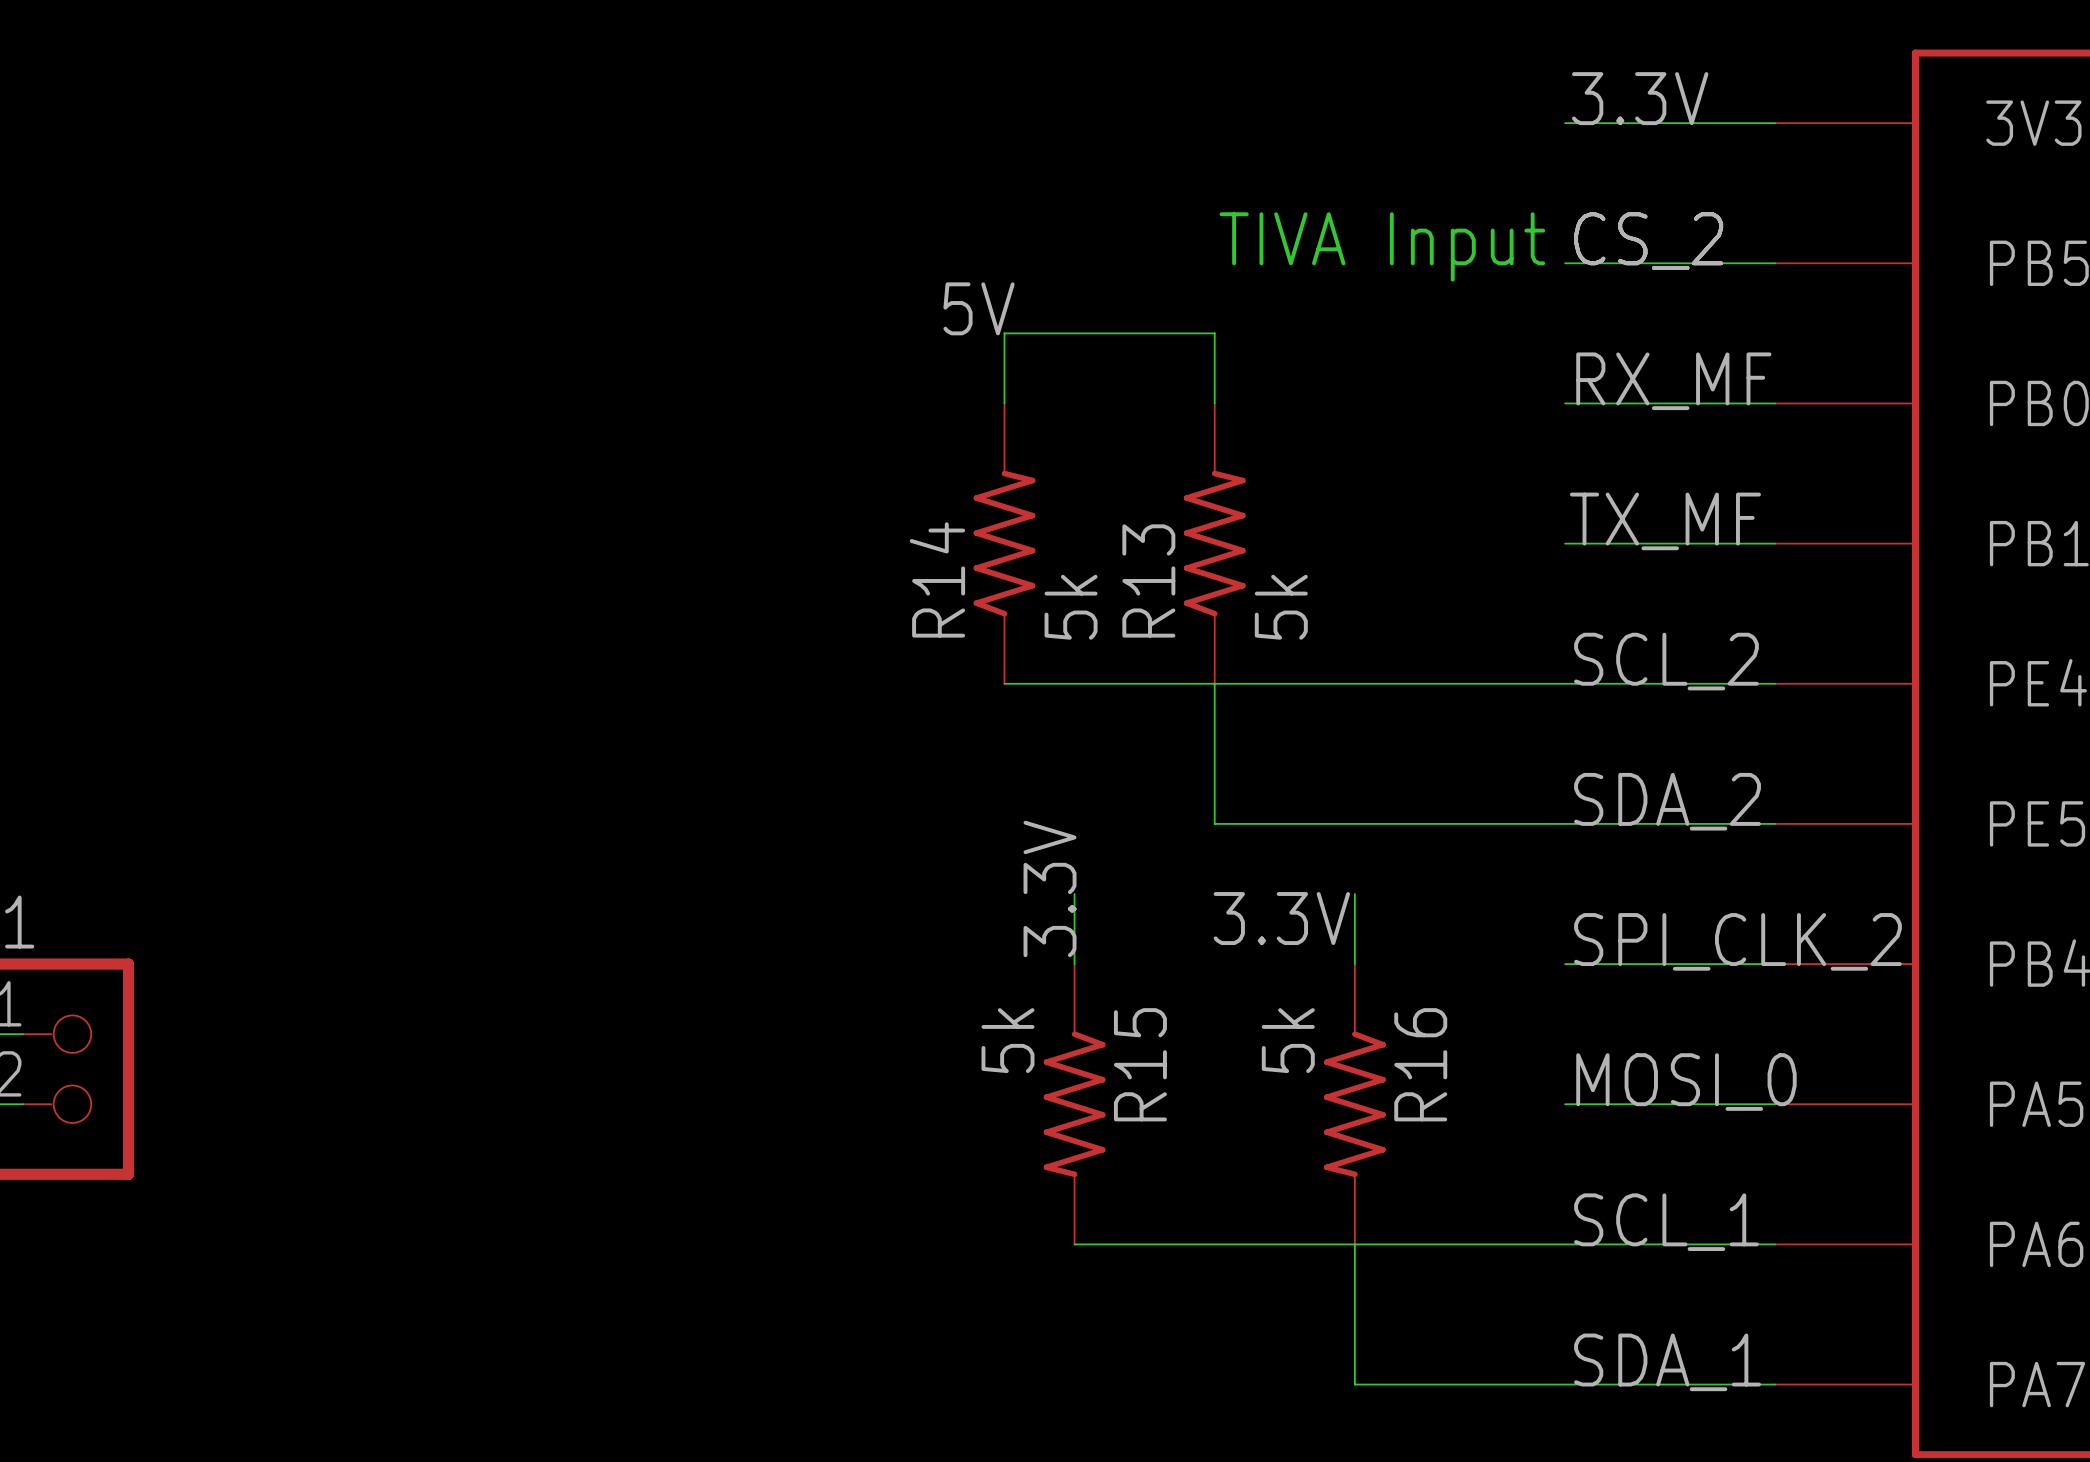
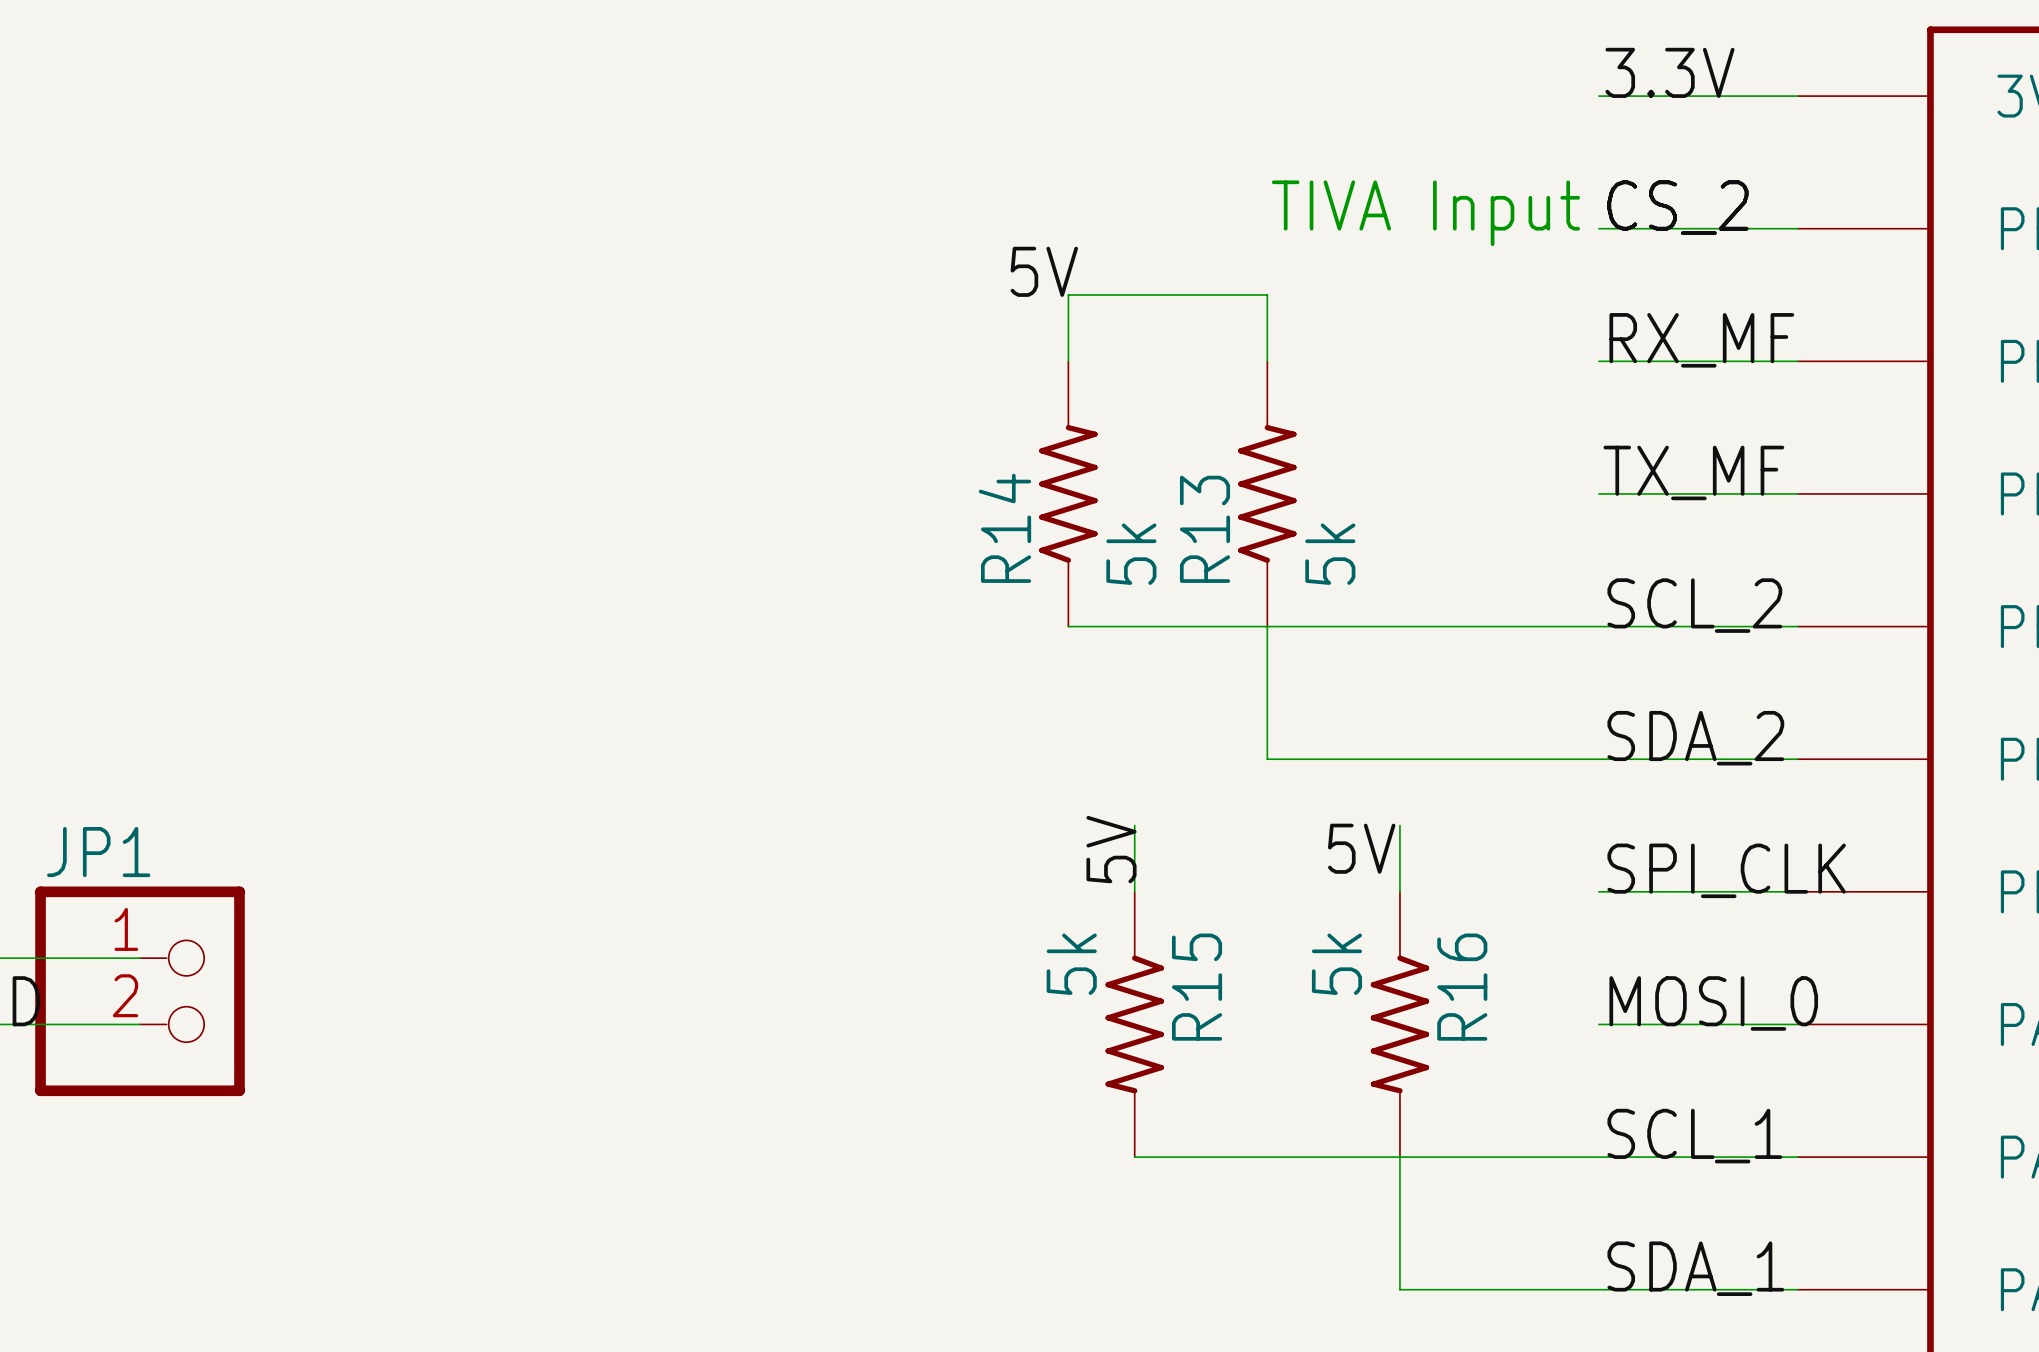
label: 3.3V (1050, 888) -> 5V (1111, 849)
label: 3.3V (1281, 918) -> 5V (1361, 848)
label: SPI_CLK_2 (1737, 941) -> SPI_CLK (1726, 870)

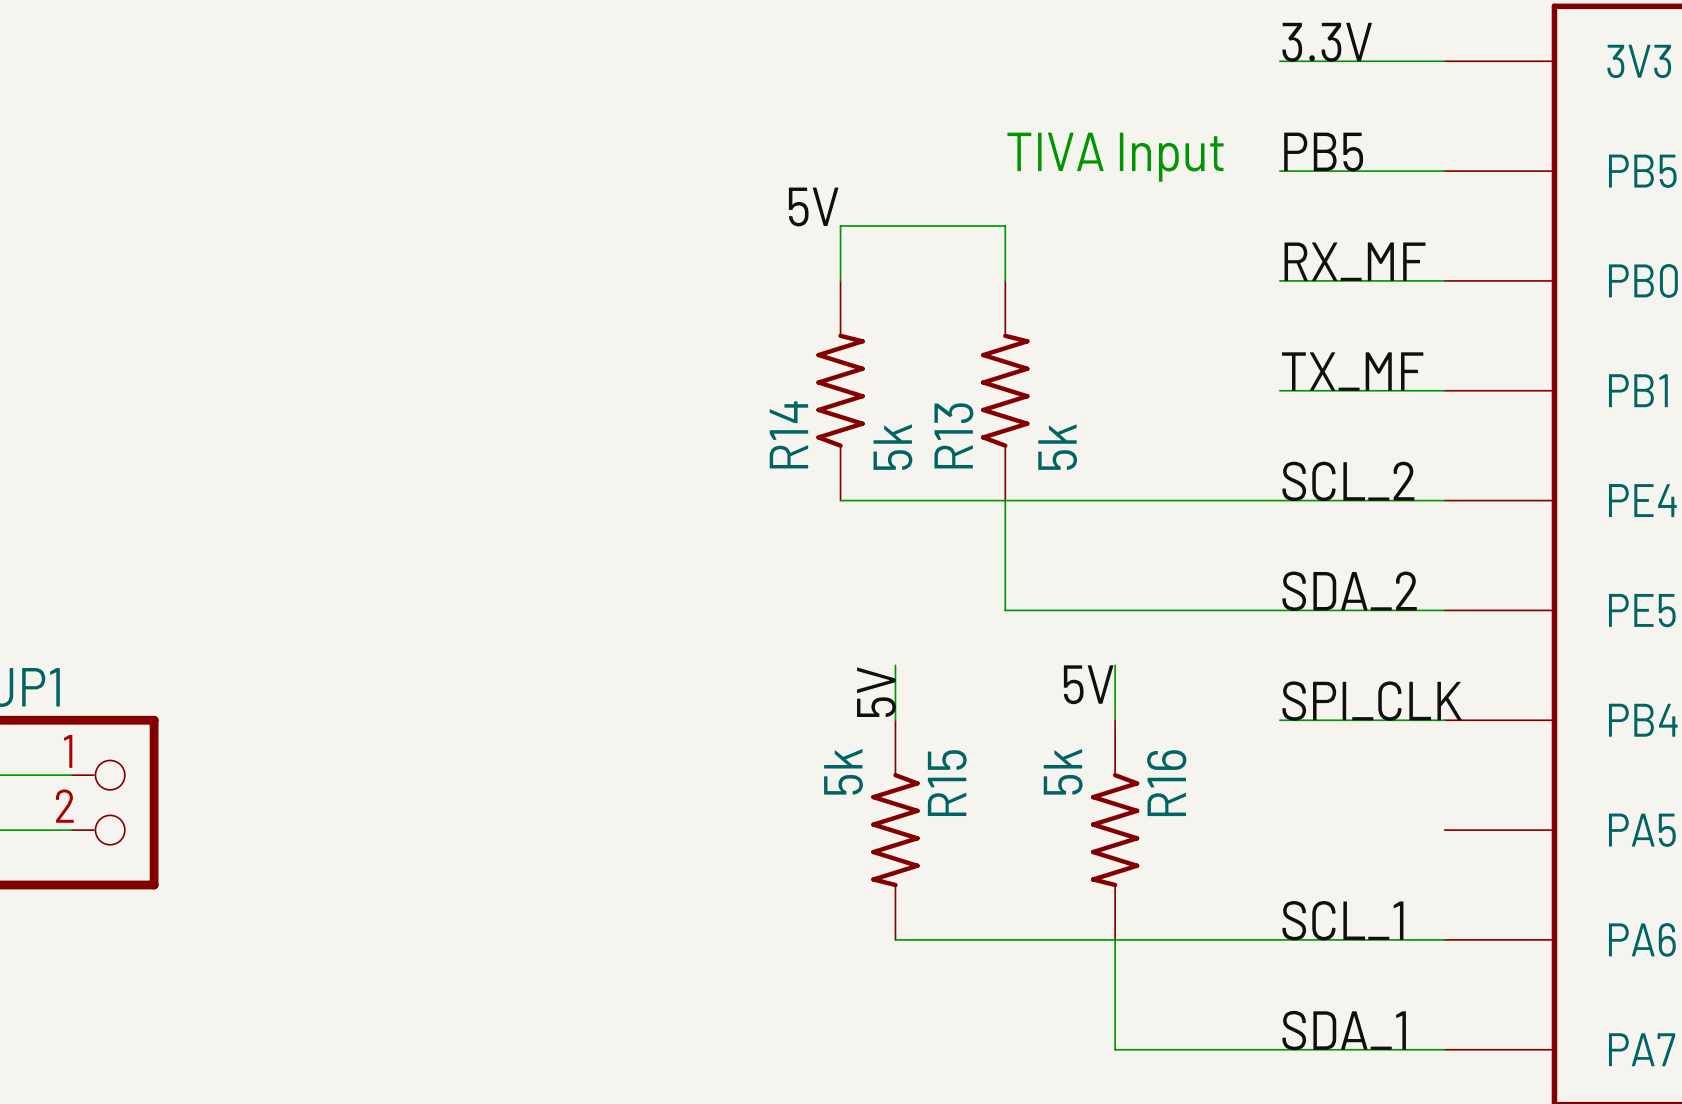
label: CS_2 (1677, 207) -> PB5 (1323, 152)
label: MOSI_0 (1713, 1003) -> none
wire: (1598, 1024) (1797, 1024) -> none

